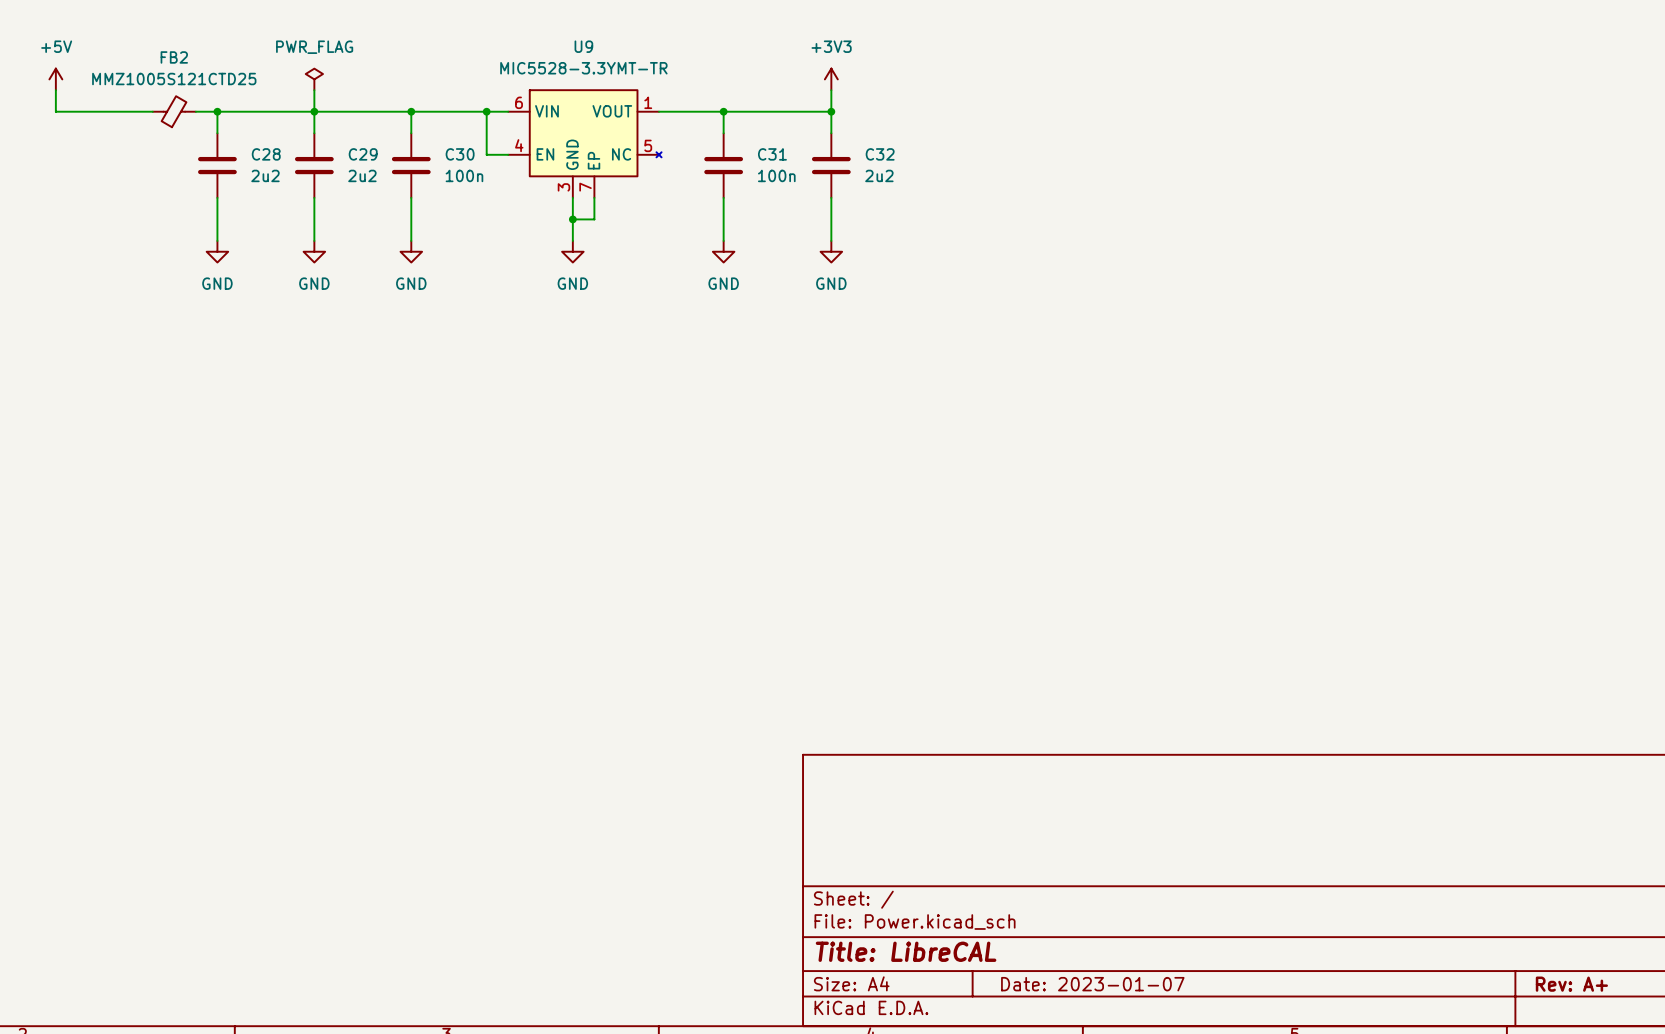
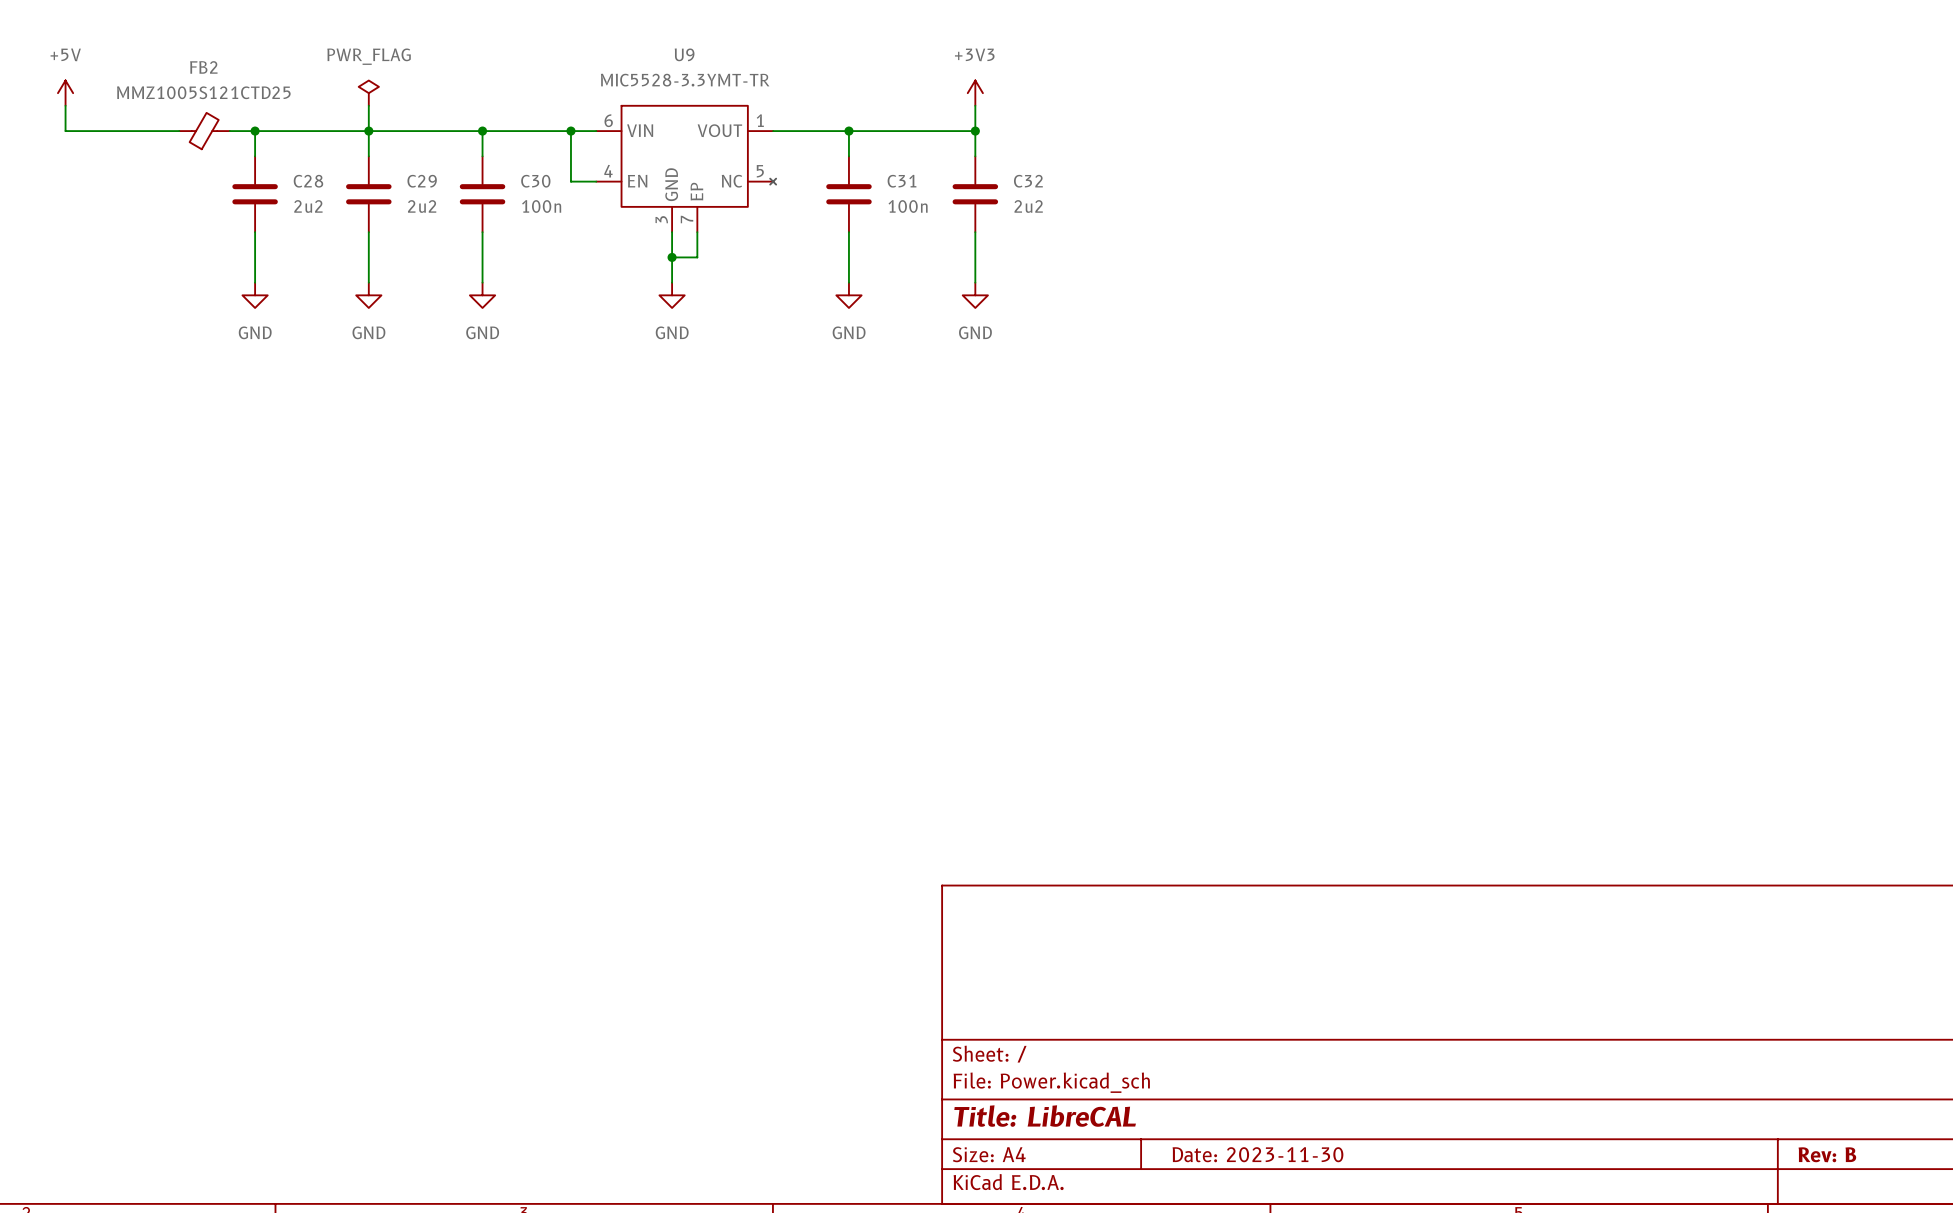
title block: Date: 2023-01-07 (1092, 984) -> Date: 2023-11-30 (1257, 1154)
title block: Rev: A+ (1571, 984) -> Rev: B (1827, 1154)

